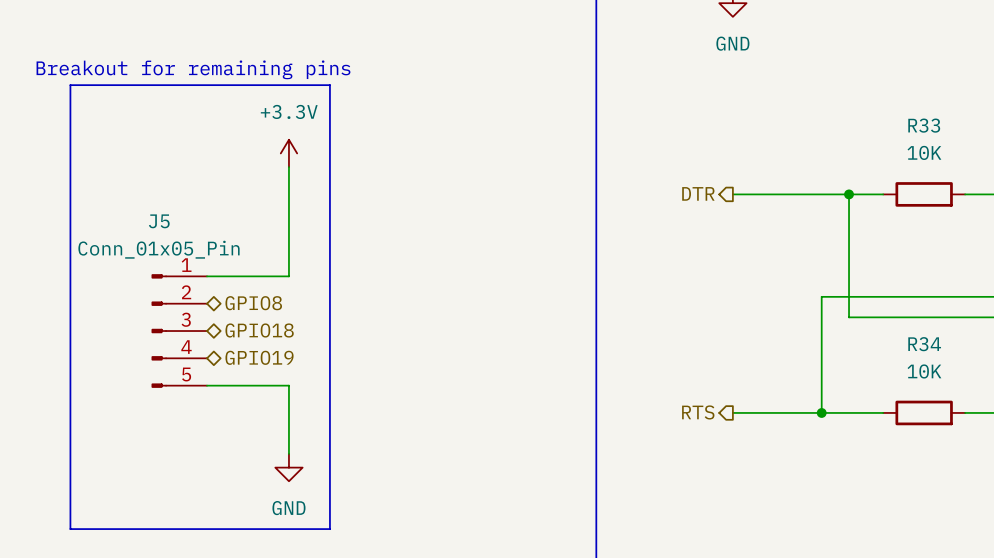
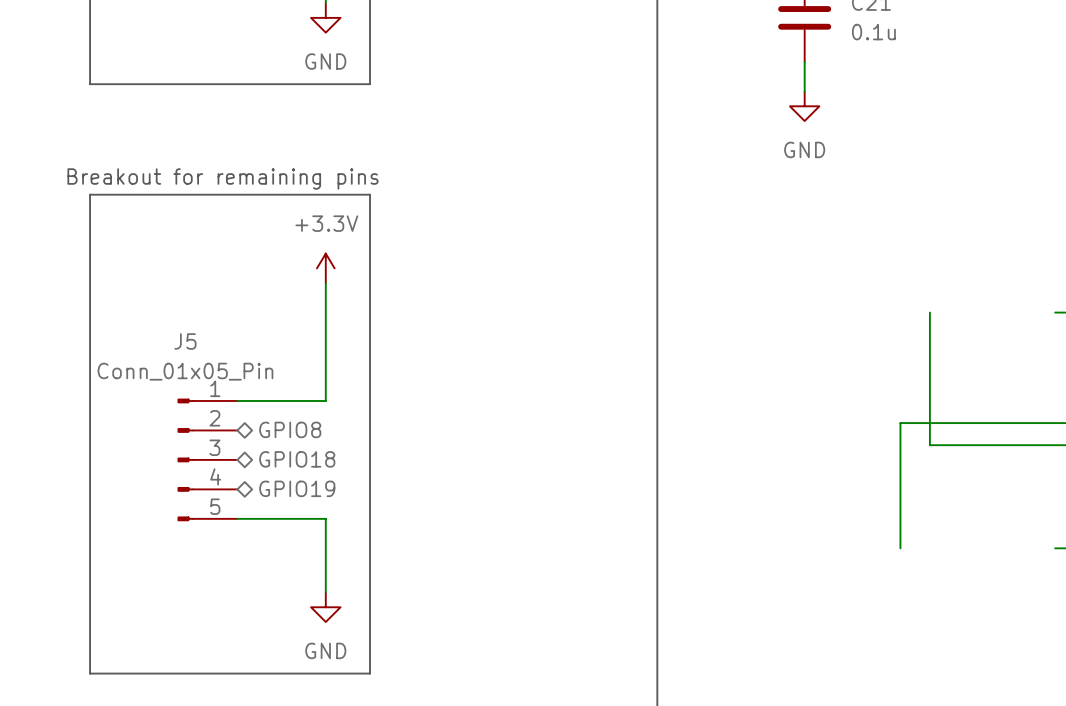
hierarchical label: DTR (698, 193) -> none
wire: (732, 194) (883, 194) -> none
junction: (849, 194) -> none
R33: 10K (924, 194) -> none
hierarchical label: RTS (698, 412) -> none
wire: (732, 412) (883, 412) -> none
junction: (821, 412) -> none
R34: 10K (924, 412) -> none

